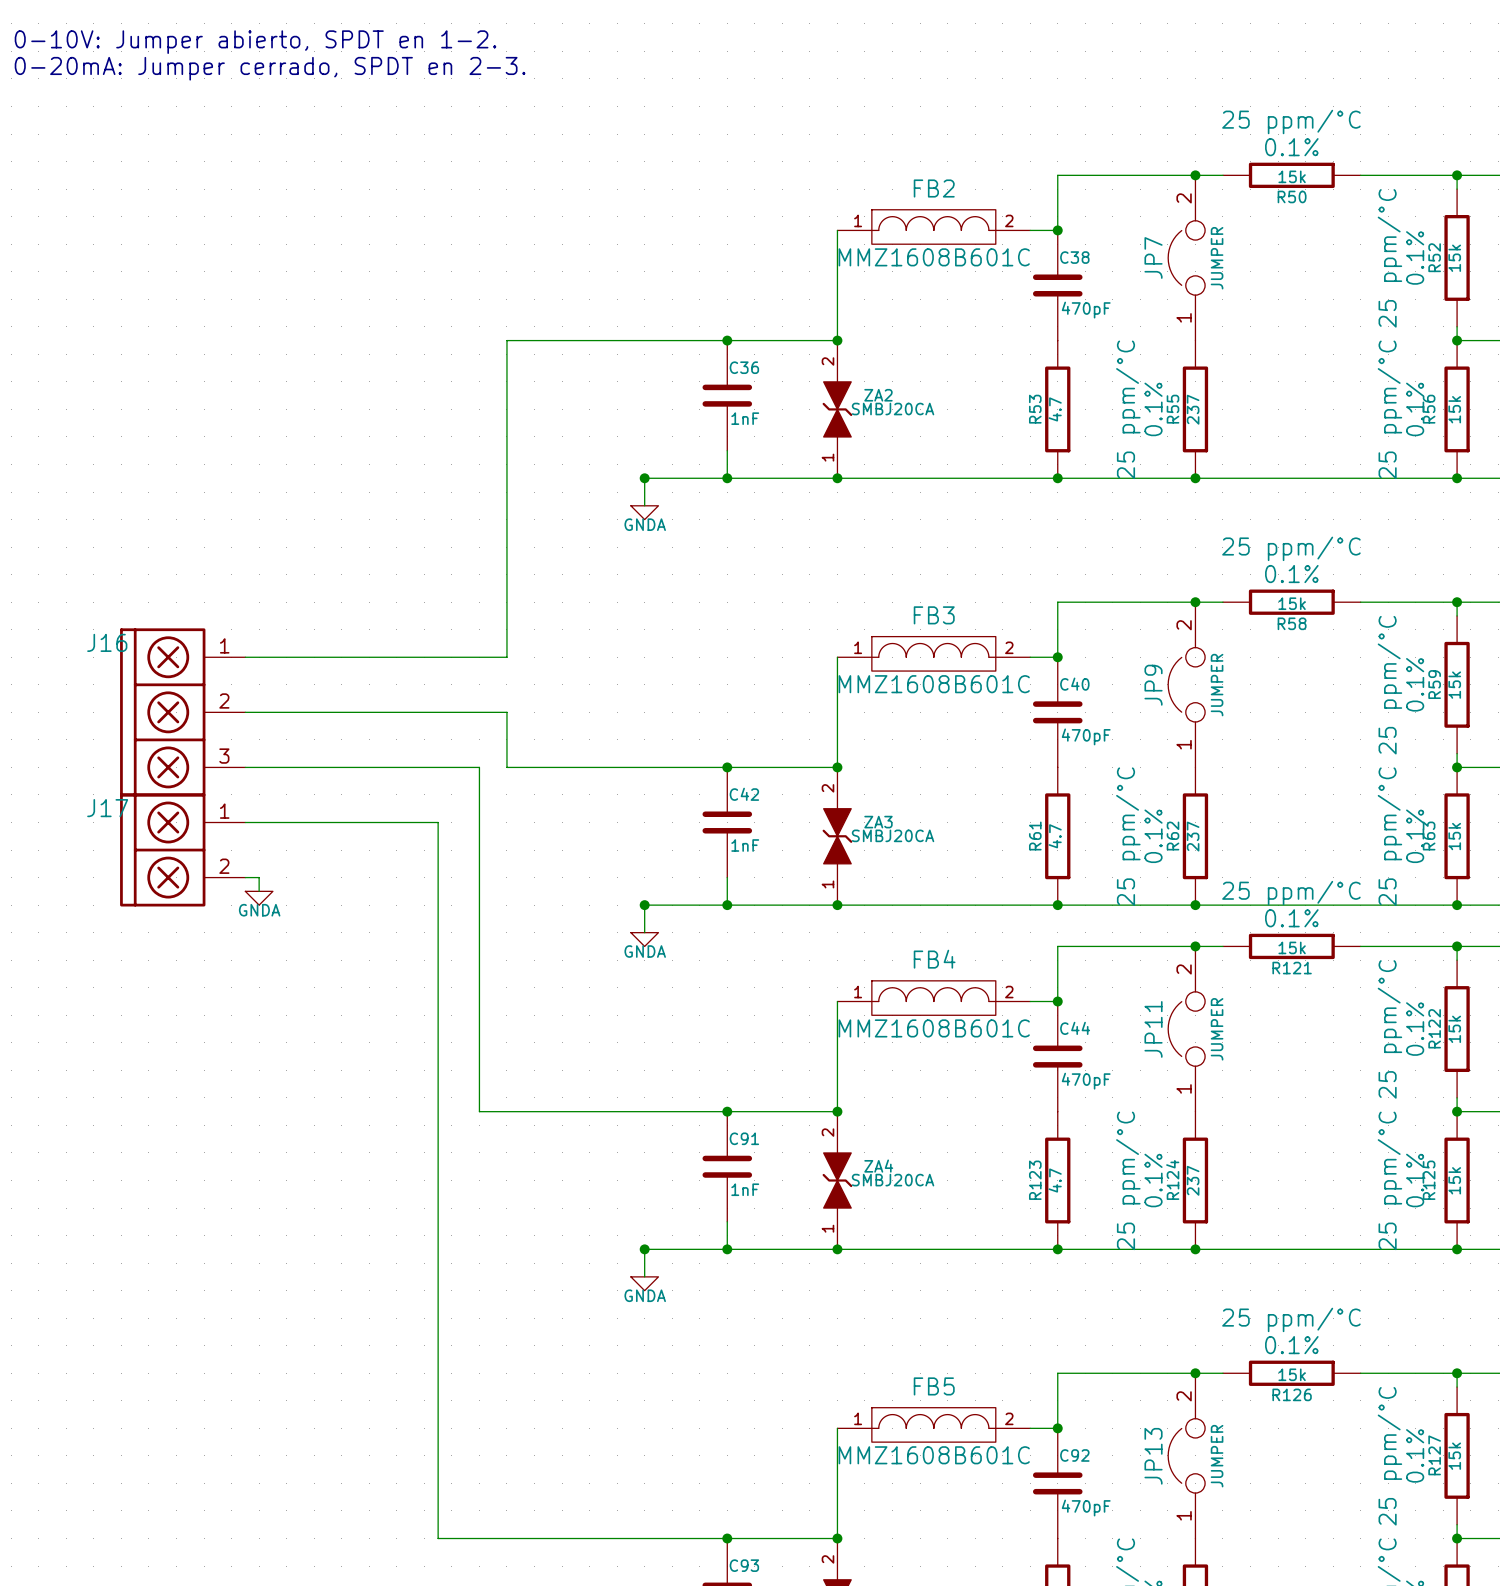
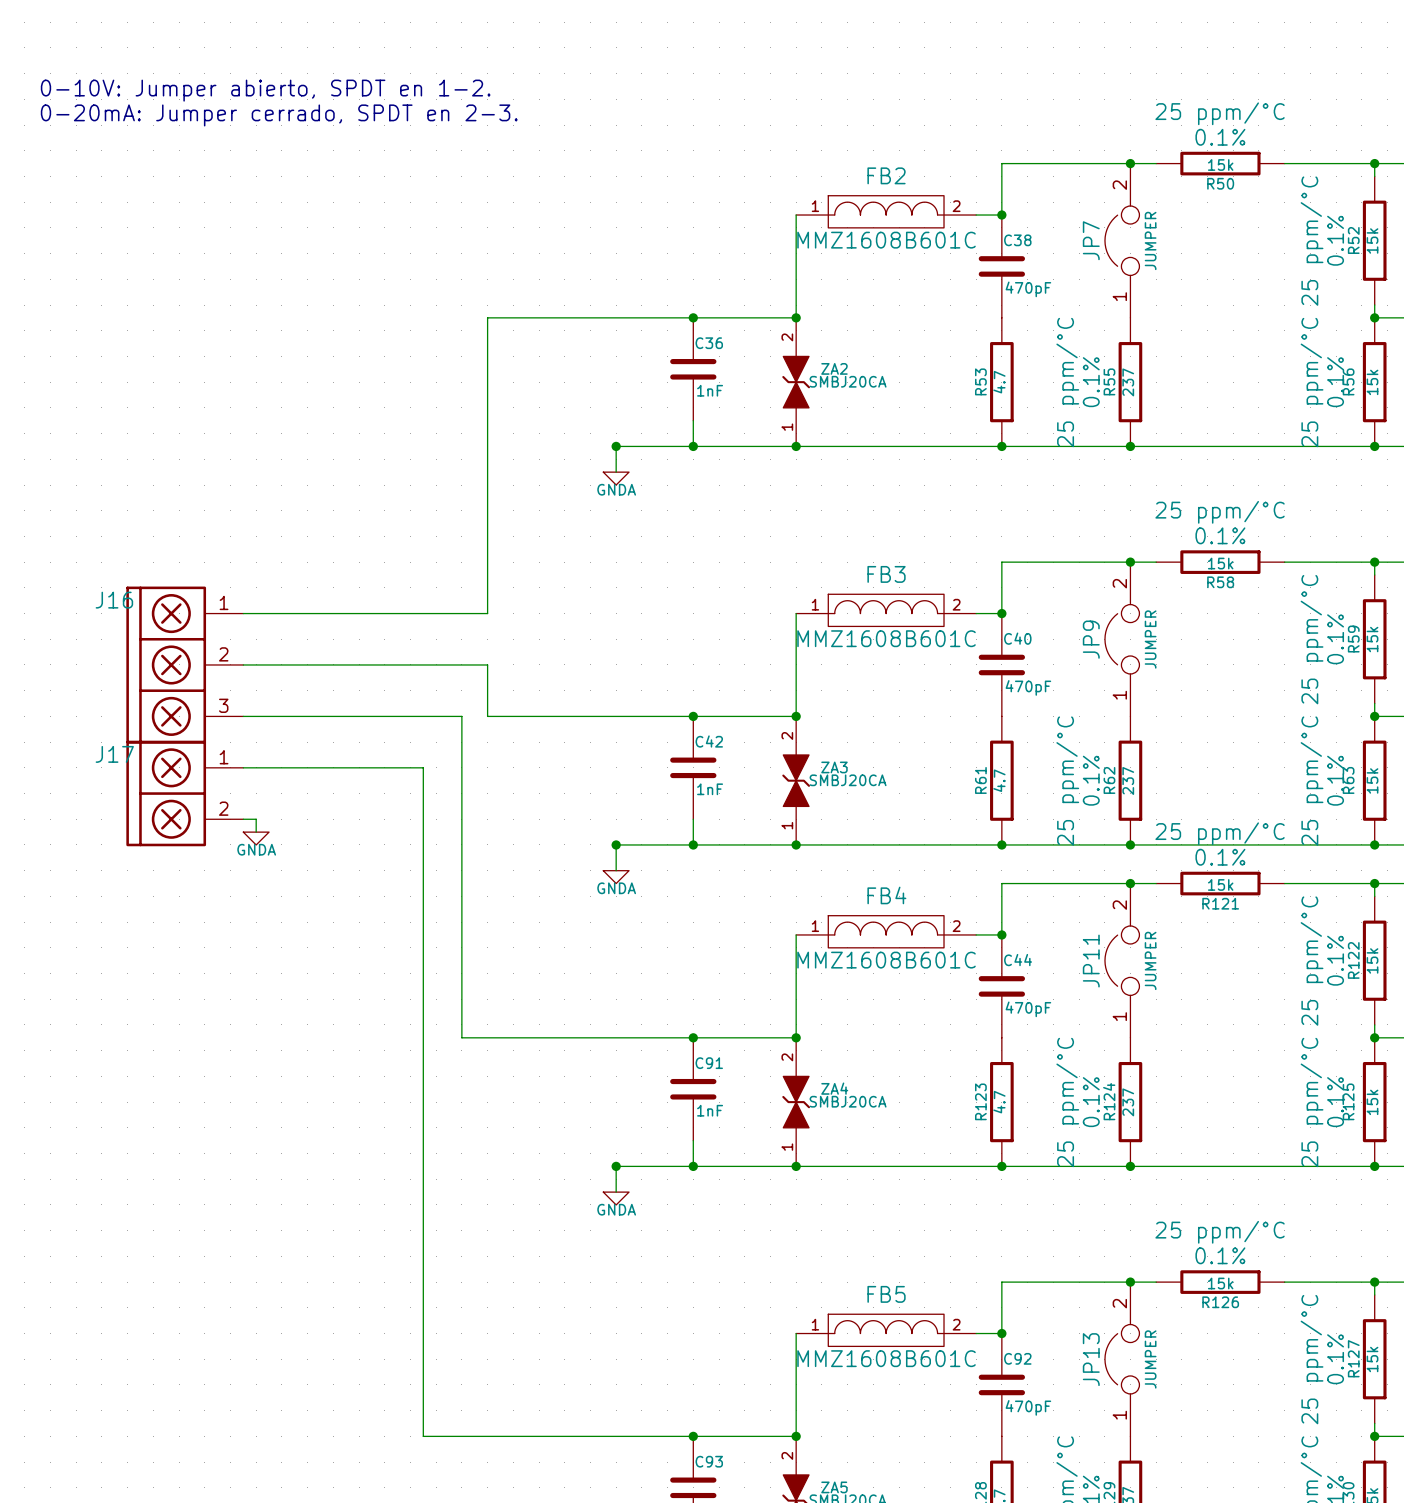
text position: 0-10V: Jumper abierto, SPDT en 1-2. (255, 42) -> 0-10V: Jumper abierto, SPDT en 1-2. (265, 90)
text position: 0-20mA: Jumper cerrado, SPDT en 2-3. (270, 68) -> 0-20mA: Jumper cerrado, SPDT en 2-3. (279, 115)

